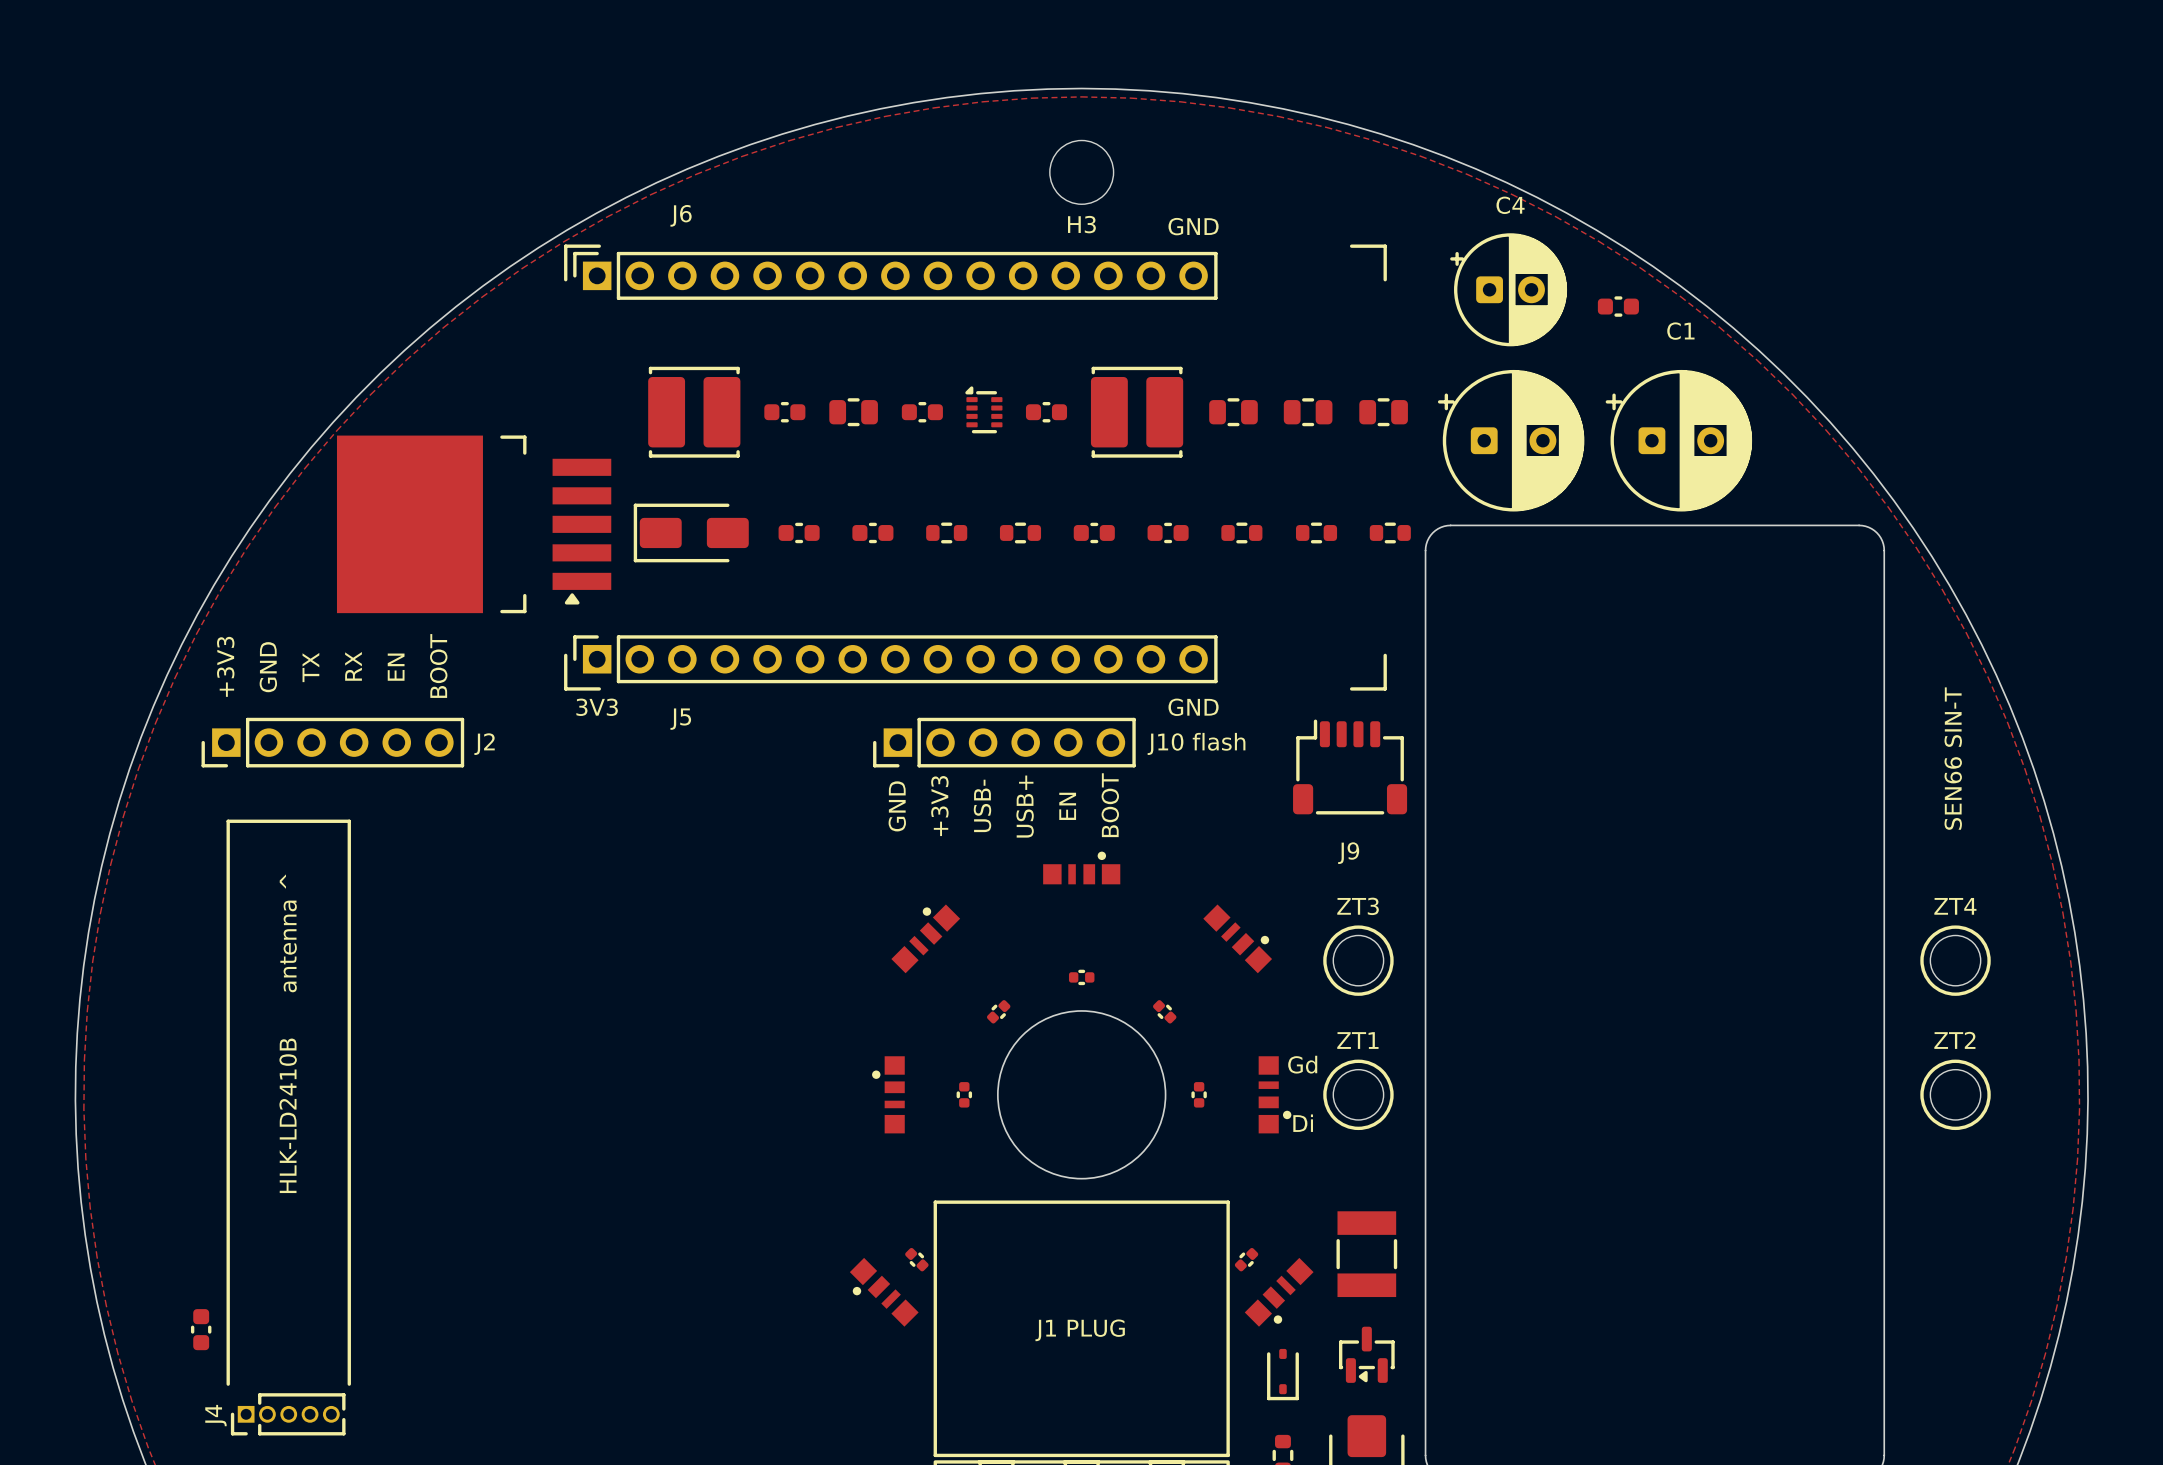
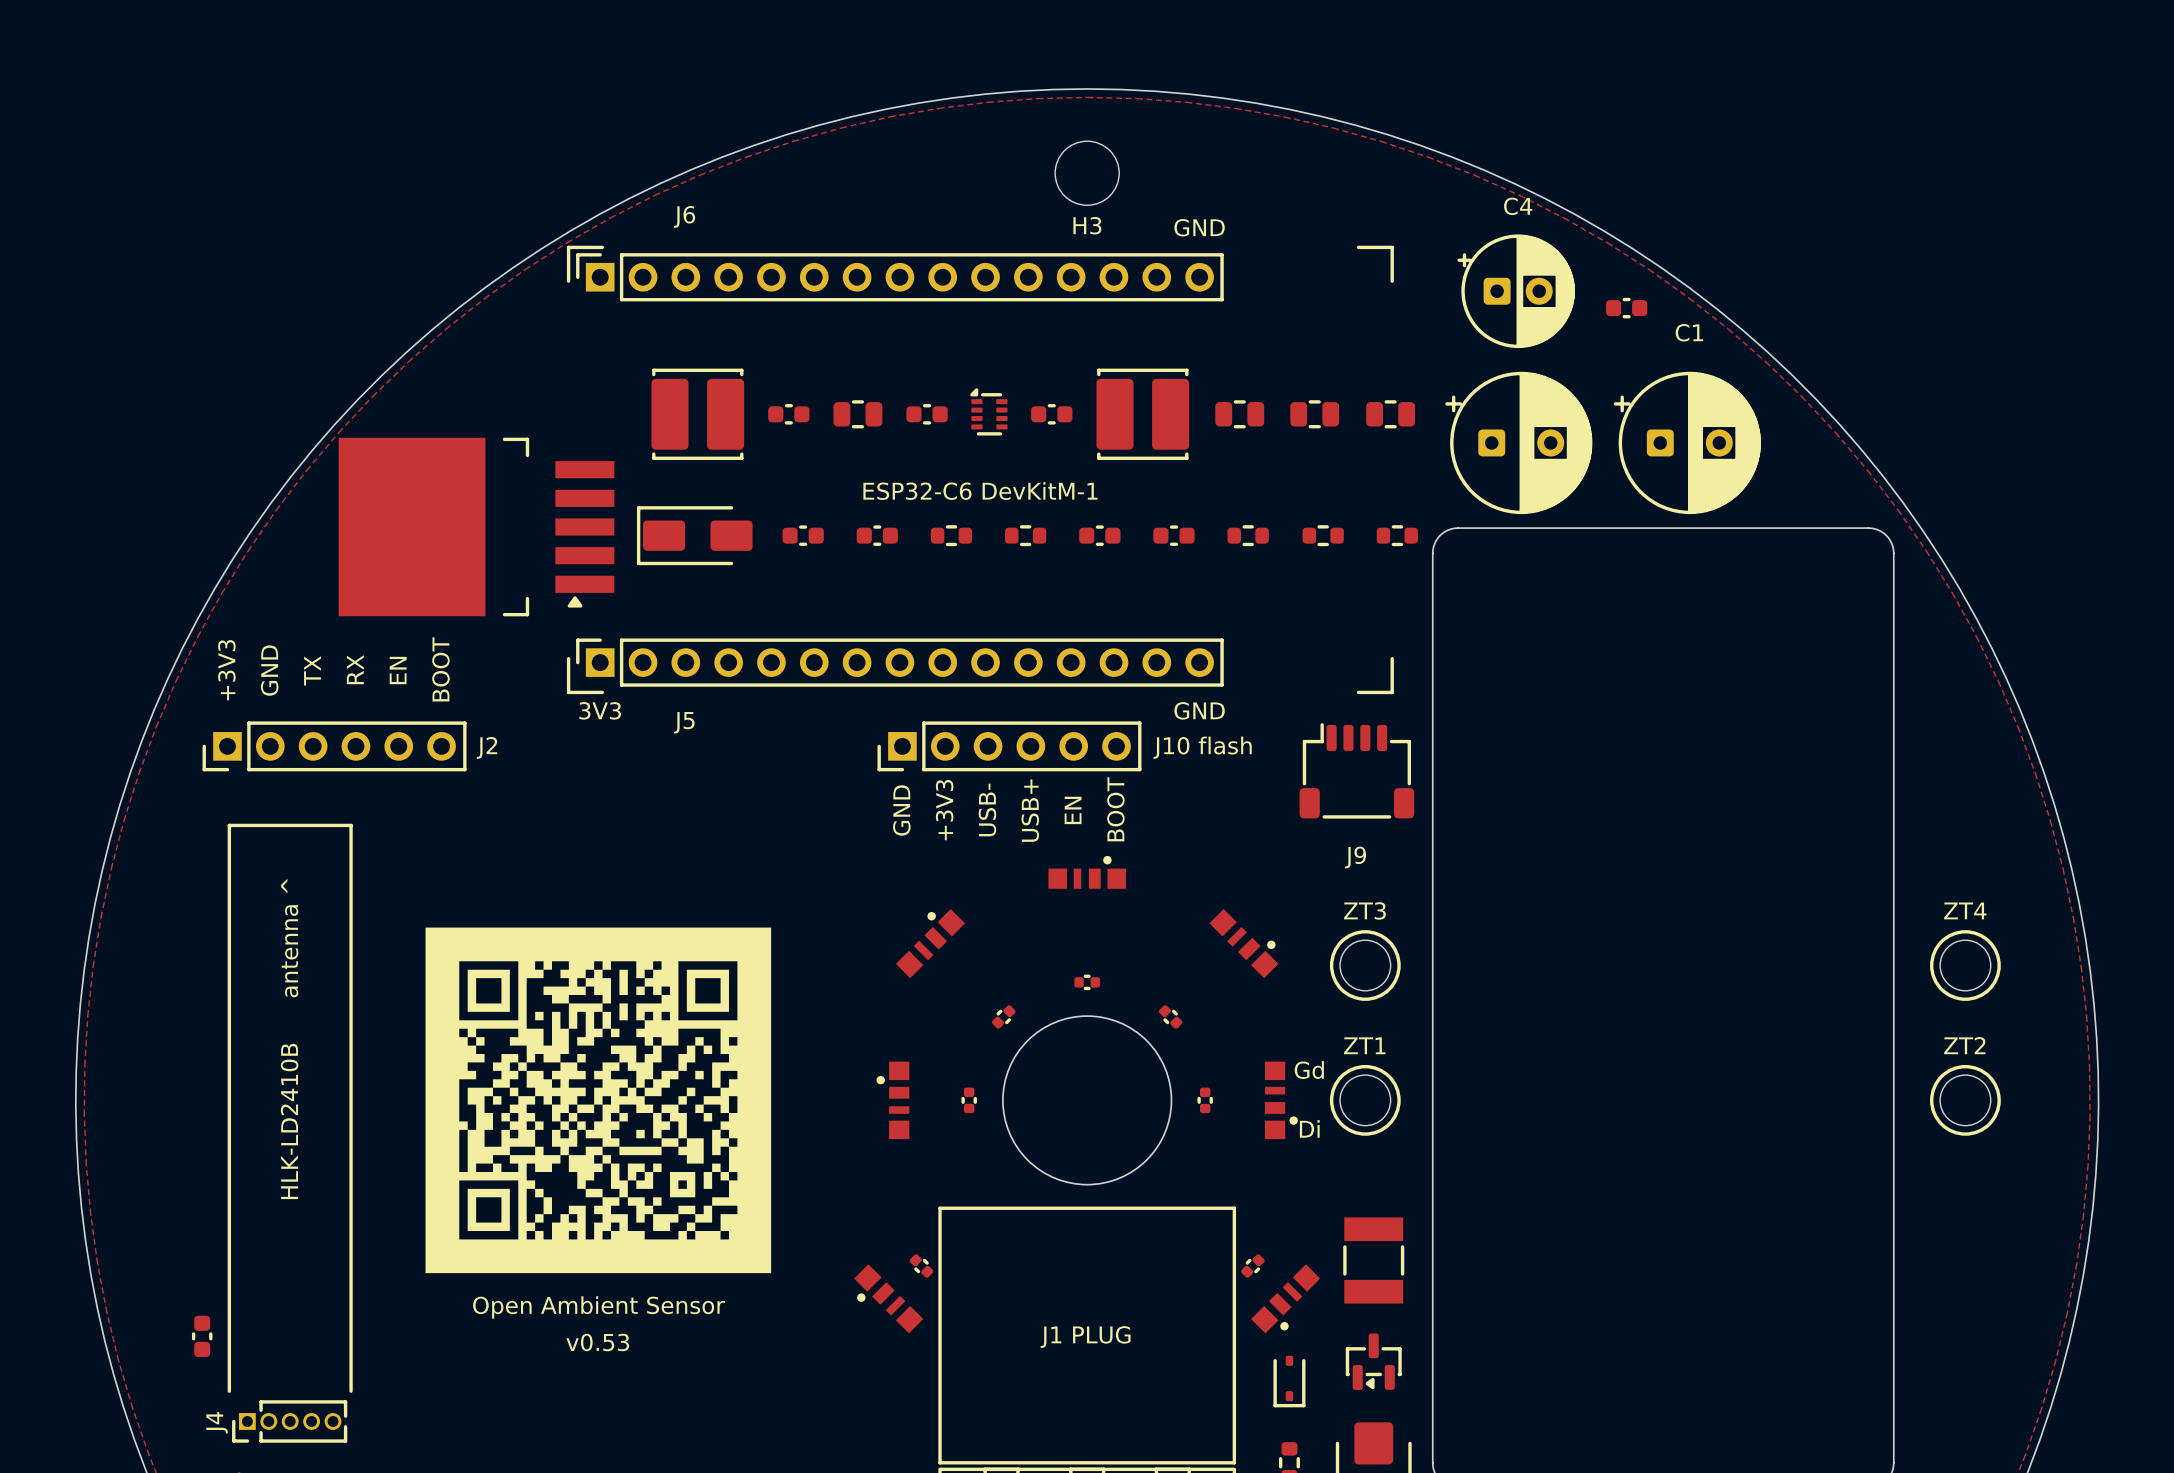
text: none -> ESP32-C6 DevKitM-1 (980, 491)
text: SEN66 SIN-T (1953, 758) -> none
drawing: none -> [425, 927, 772, 1274]
text: none -> Open Ambient Sensor (598, 1307)
text: none -> v0.53 (597, 1342)

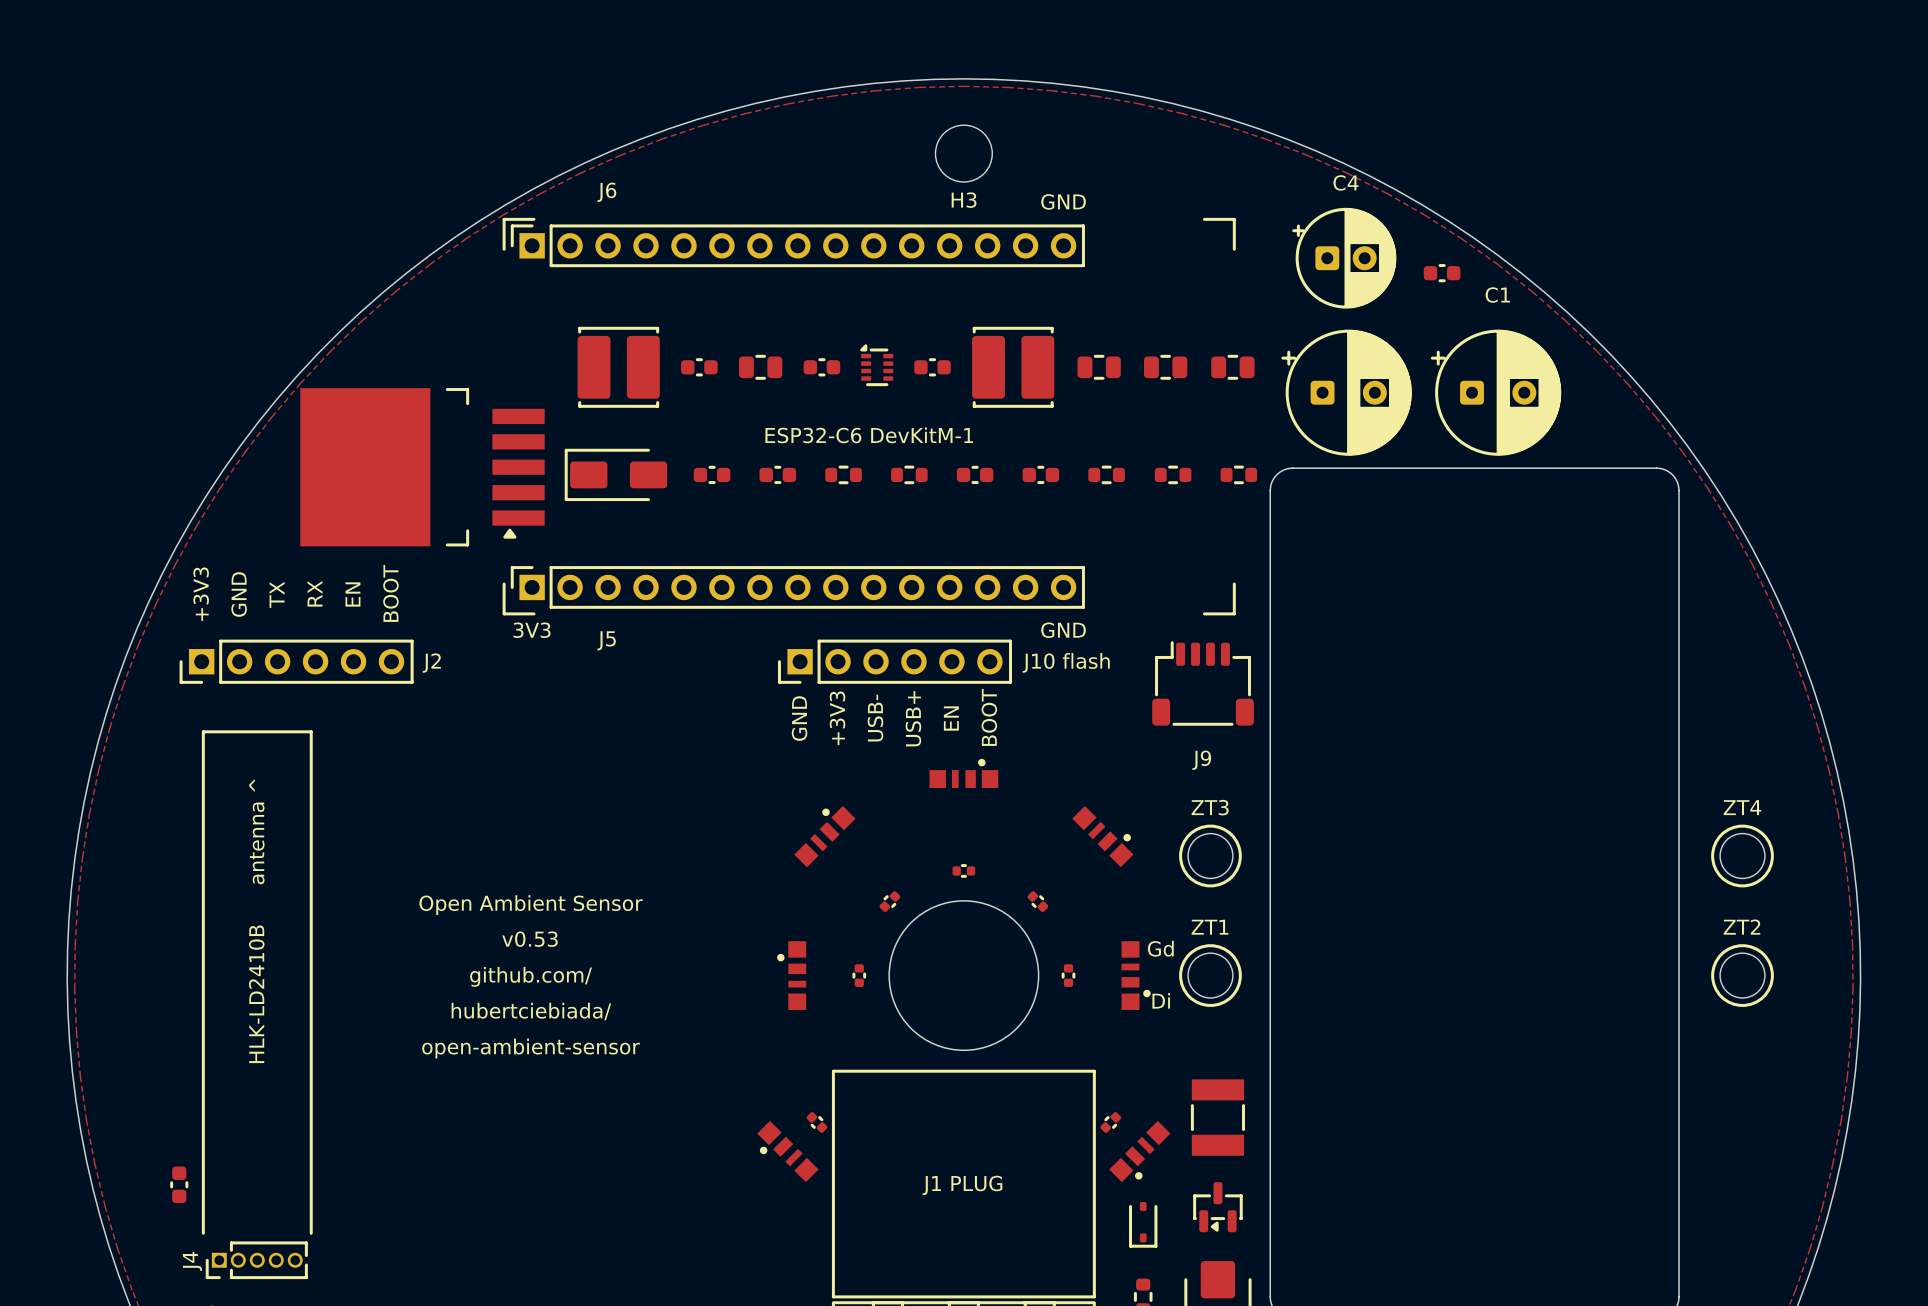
drawing: [425, 927, 772, 1274] -> none
text: none -> github.com/ (531, 976)
text: none -> hubertciebiada/ (531, 1011)
text: none -> open-ambient-sensor (531, 1048)
text position: Open Ambient Sensor (598, 1307) -> Open Ambient Sensor (531, 905)
text position: v0.53 (597, 1342) -> v0.53 (529, 939)

